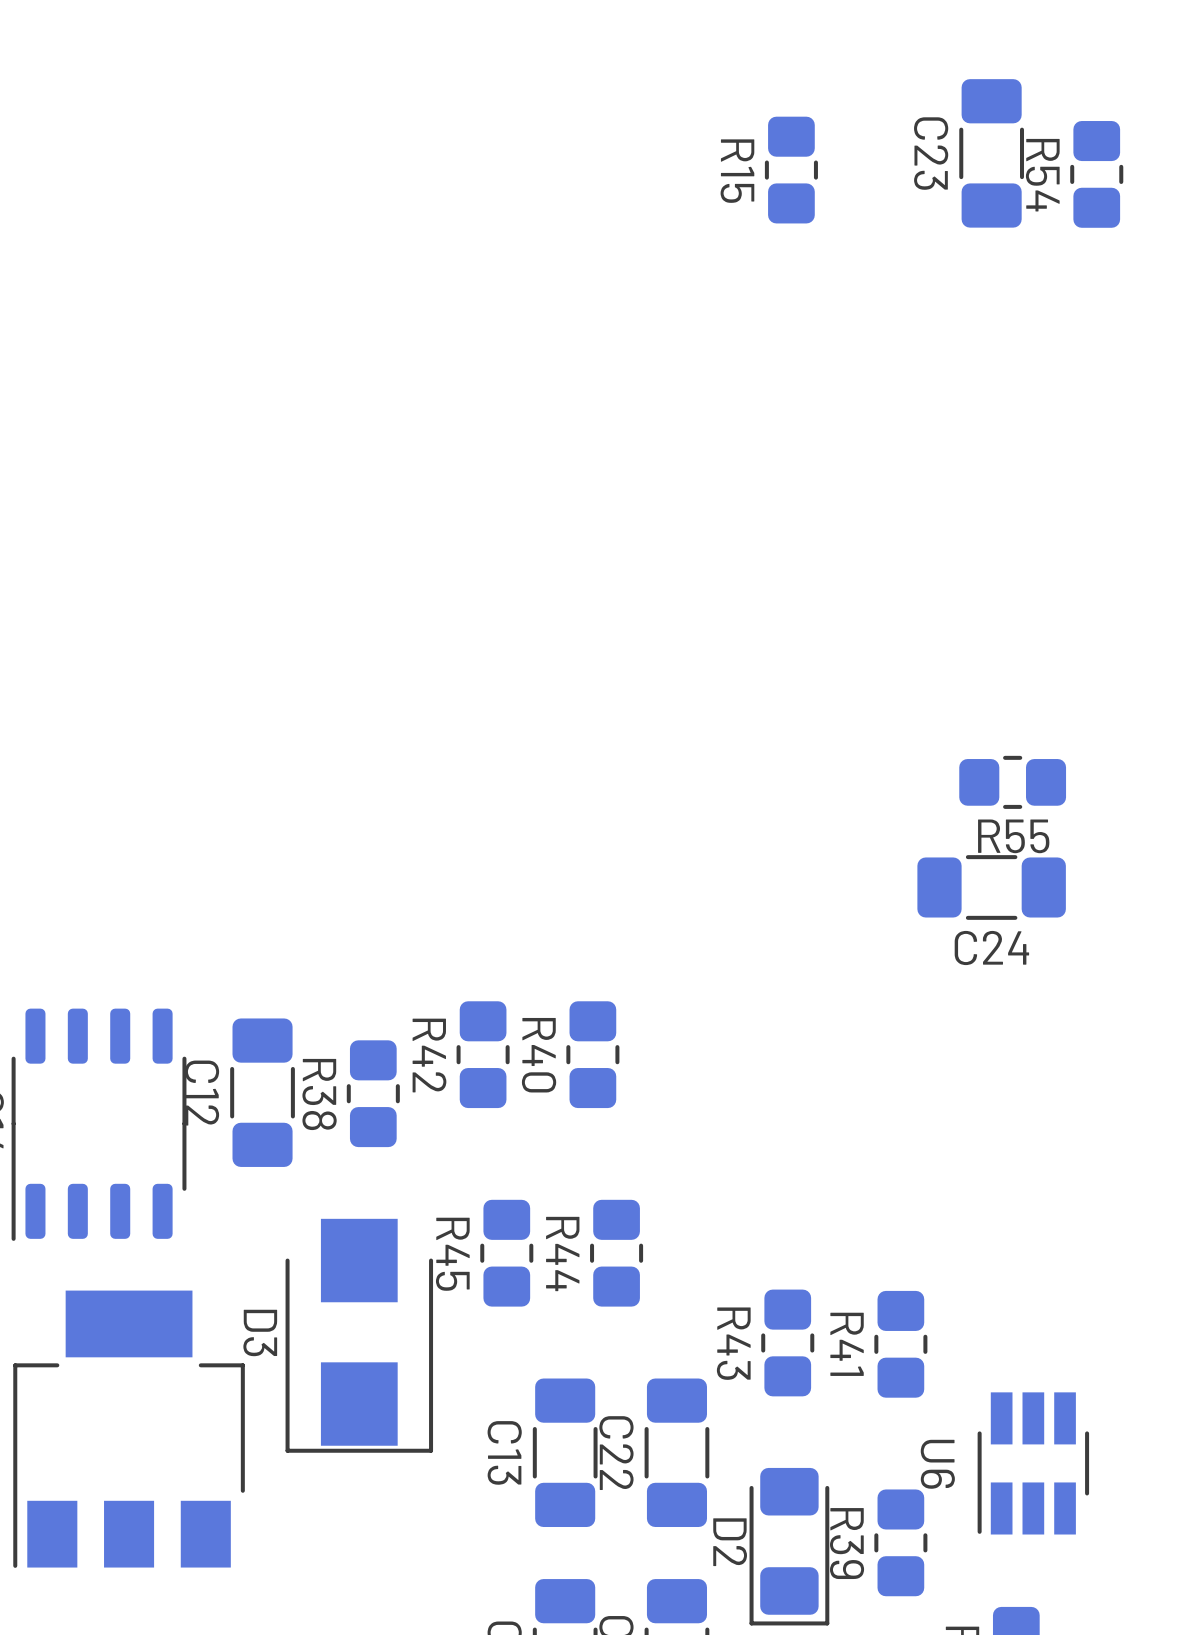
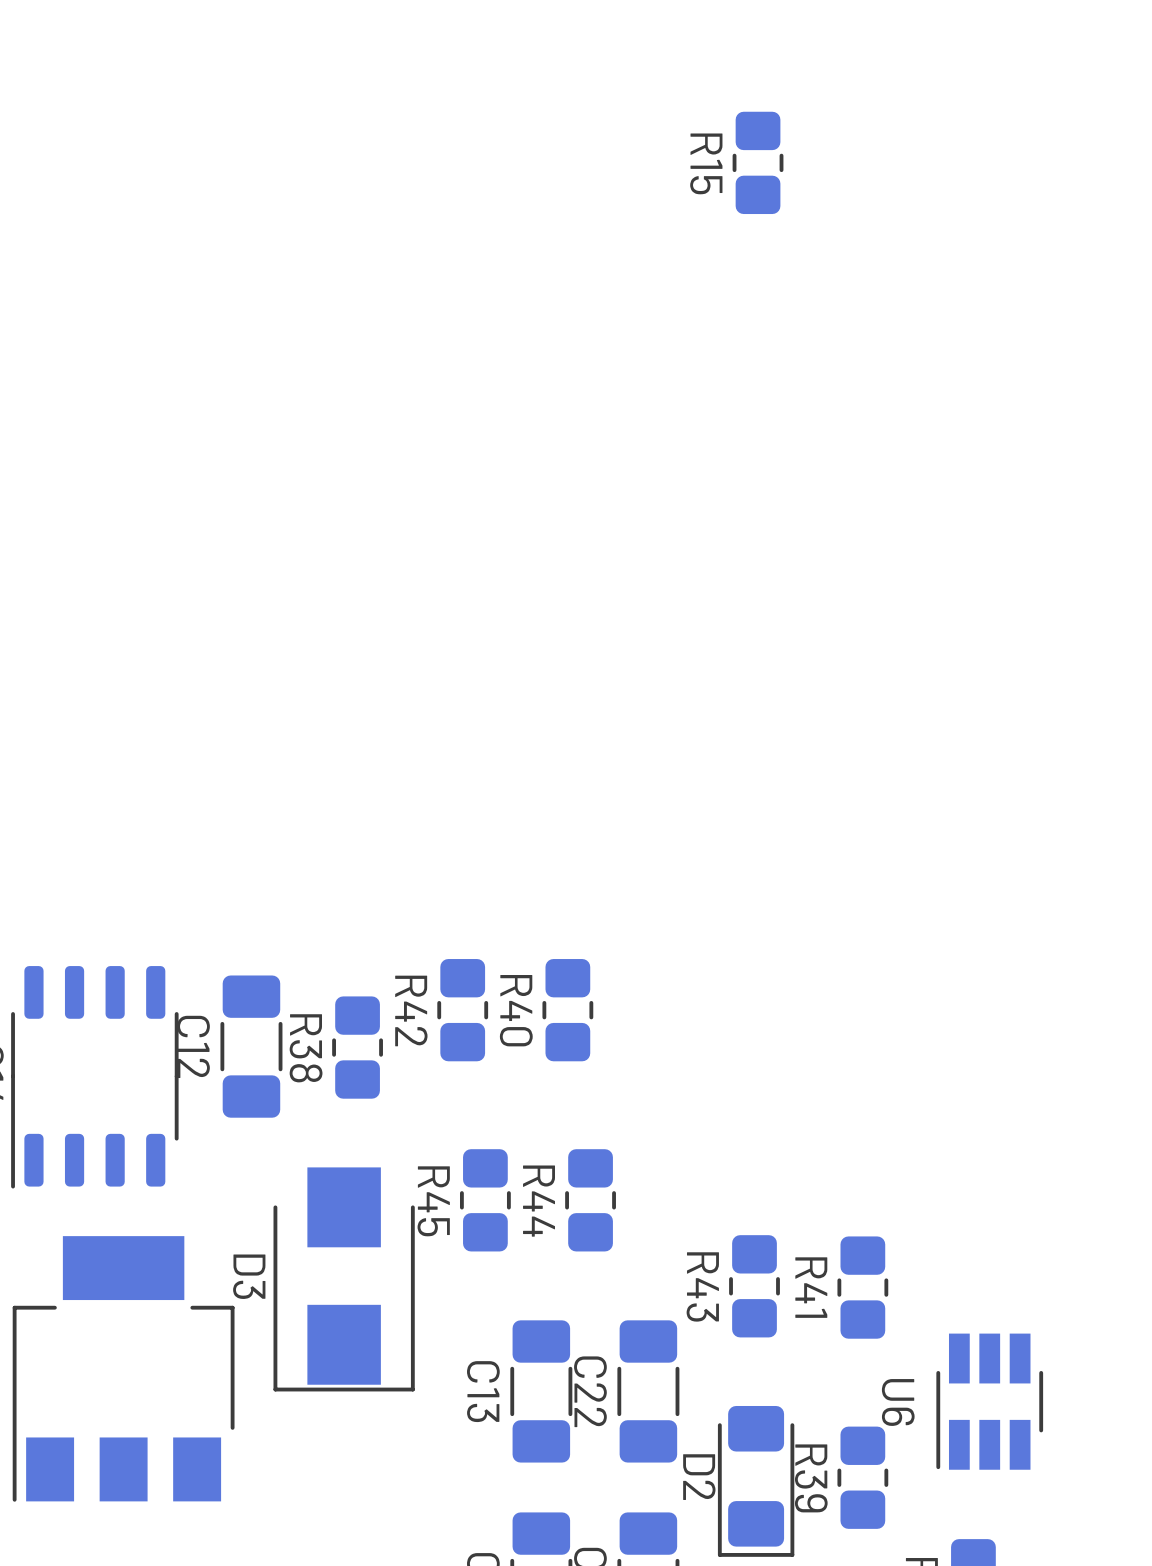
C23: (991, 153) -> none
R54: (1096, 174) -> none
R55: (1012, 782) -> none
C24: (991, 887) -> none

